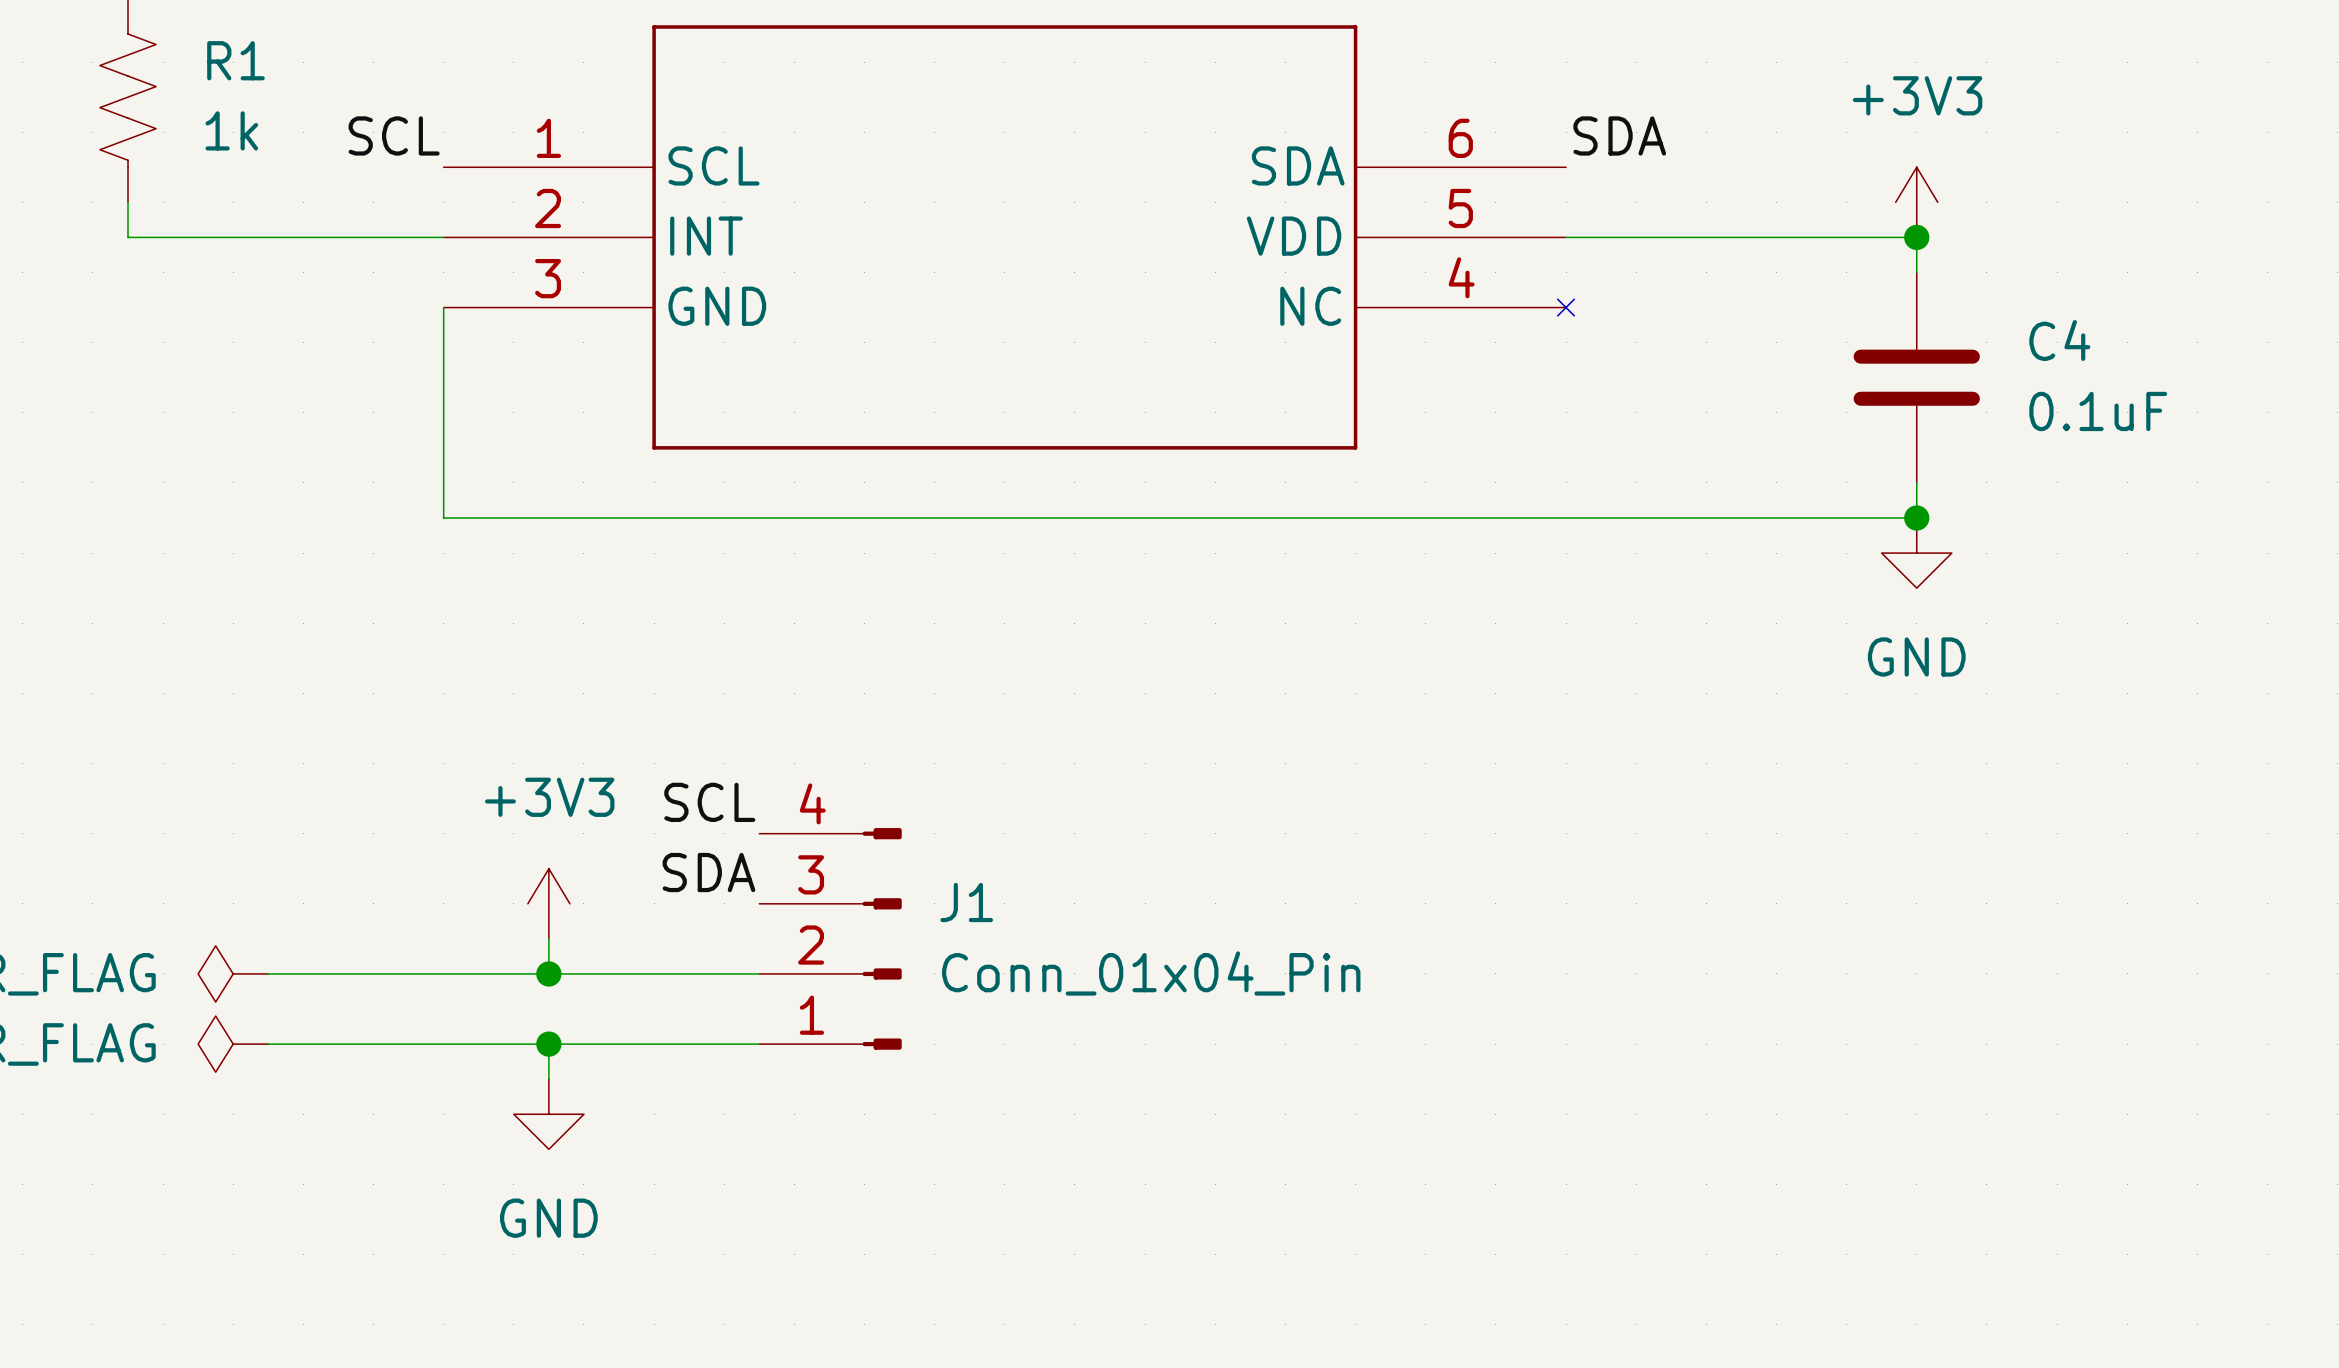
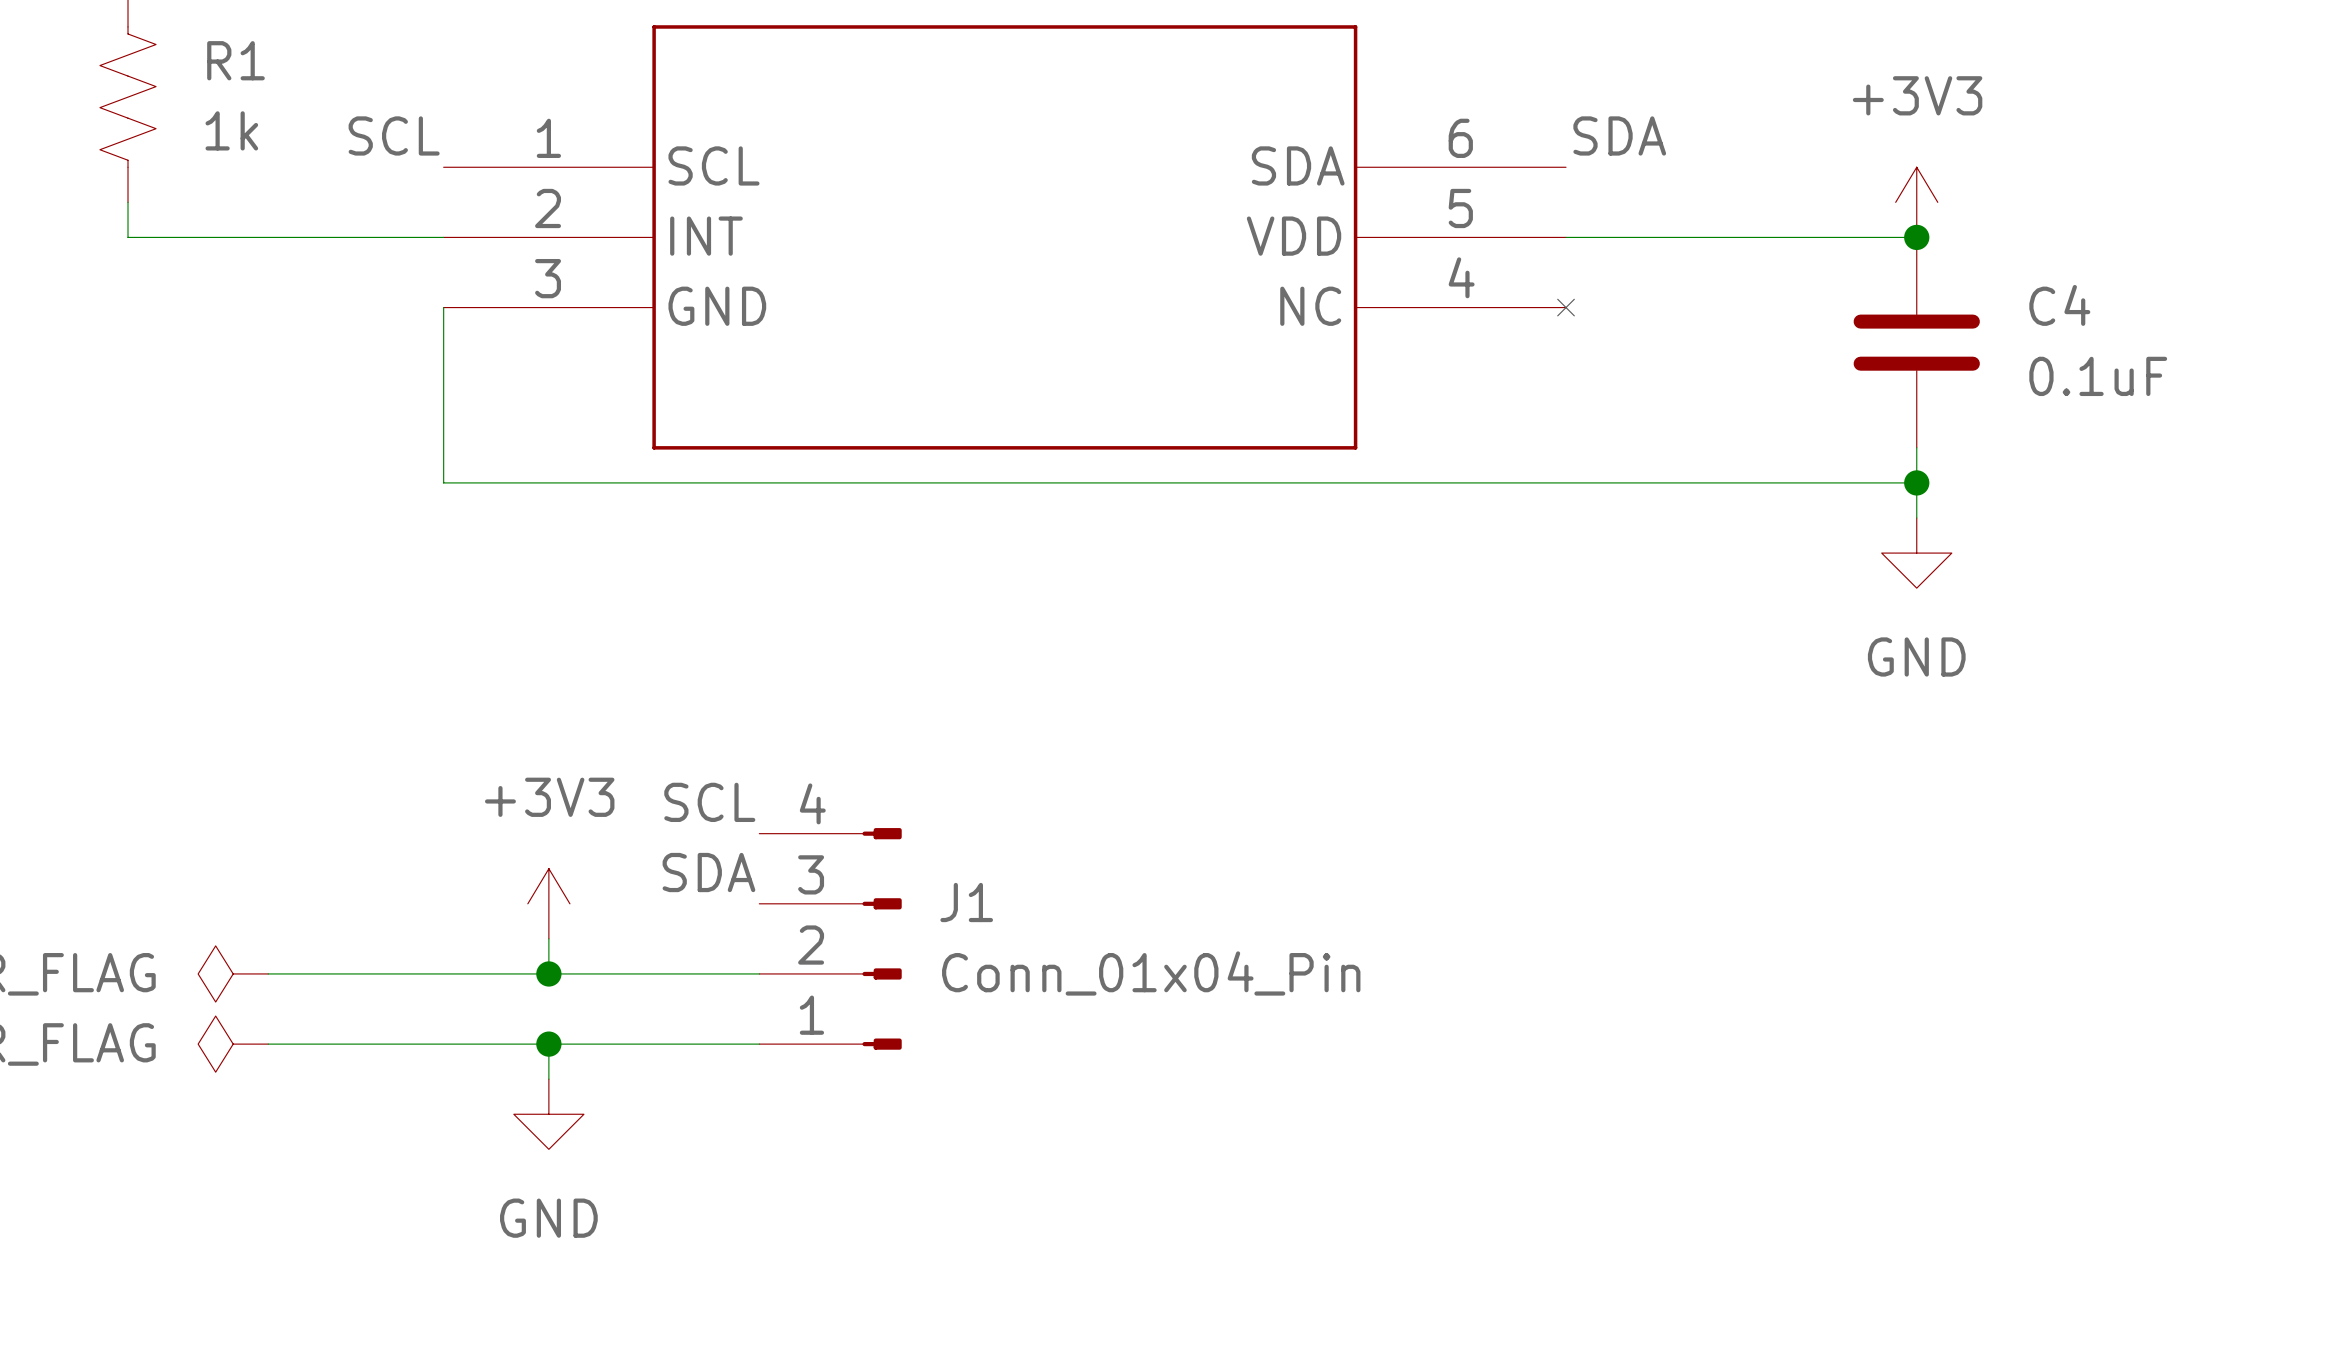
C4 position: (1916, 377) -> (1916, 342)
wire: (443, 482) (443, 518) (1916, 518) -> (443, 482) (1916, 482) (1916, 447)
junction position: (1916, 518) -> (1916, 482)

